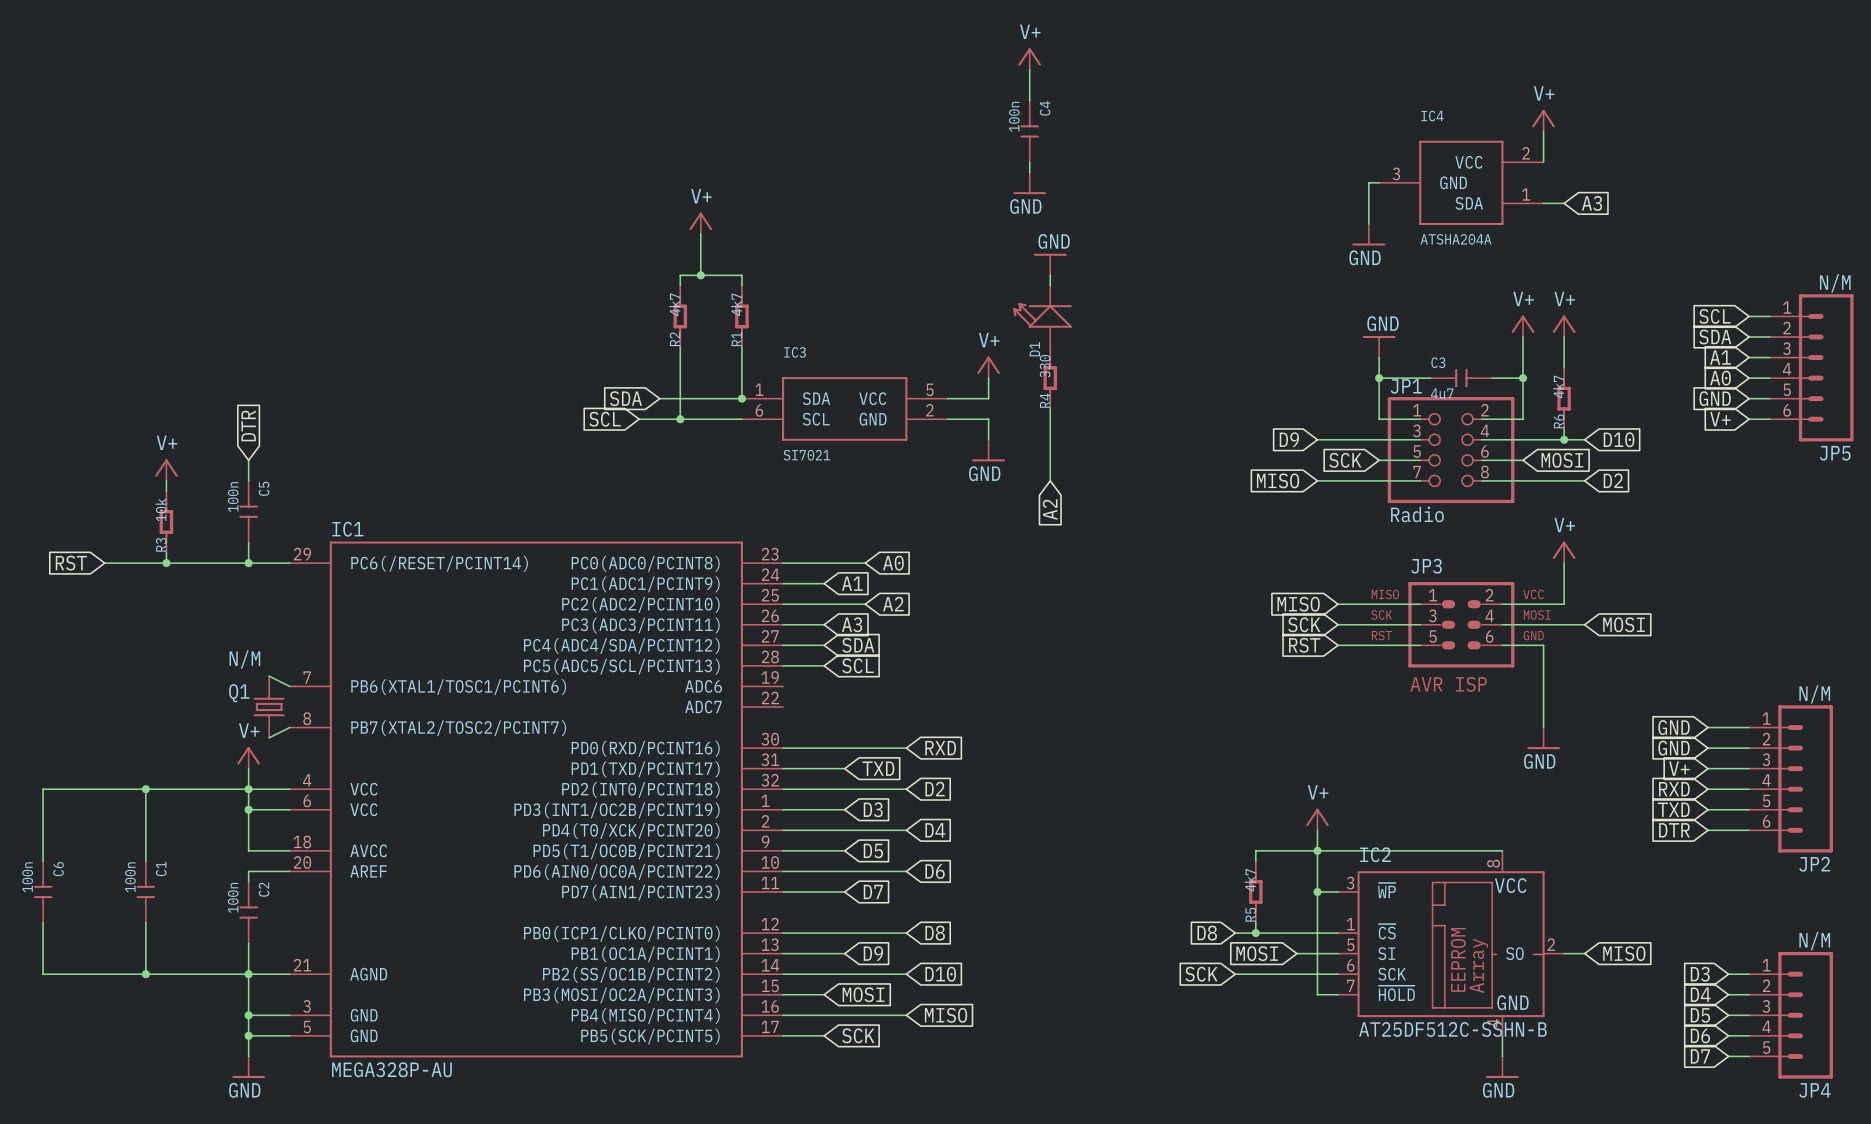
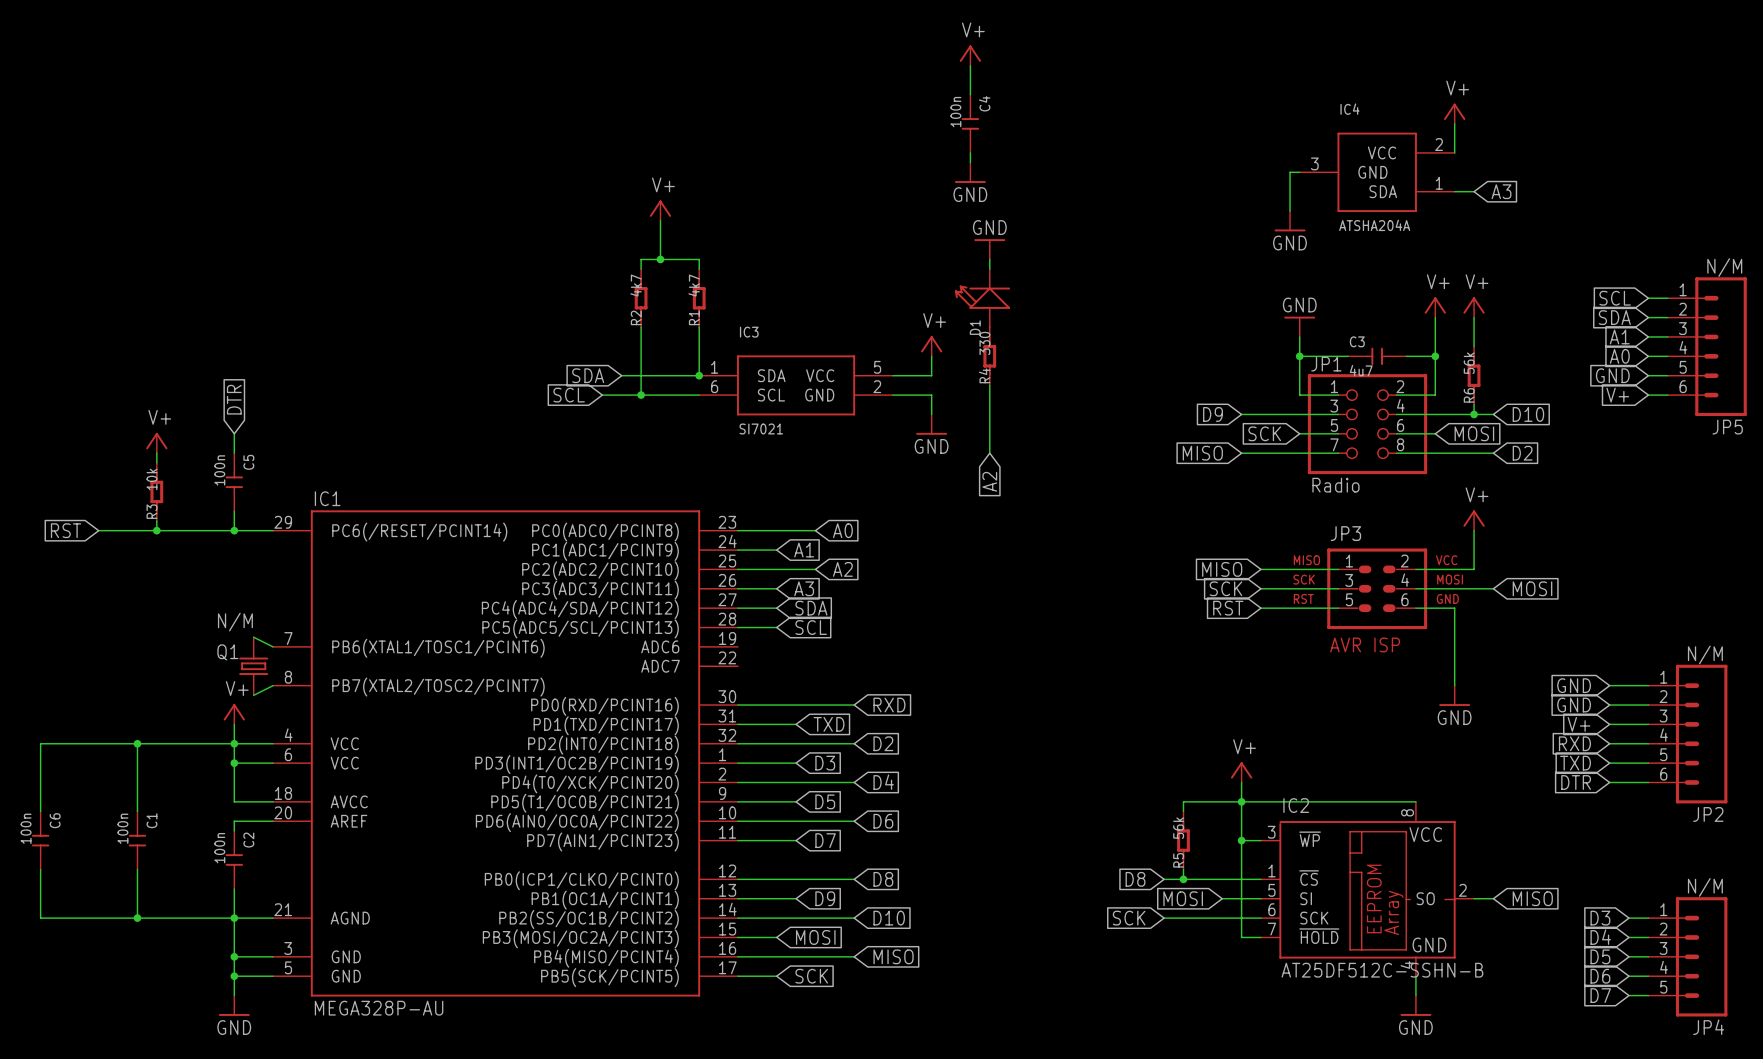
R6 value: 4k7 (1558, 386) -> 56k (1469, 363)
R5 value: 4k7 (1250, 880) -> 56k (1178, 828)

